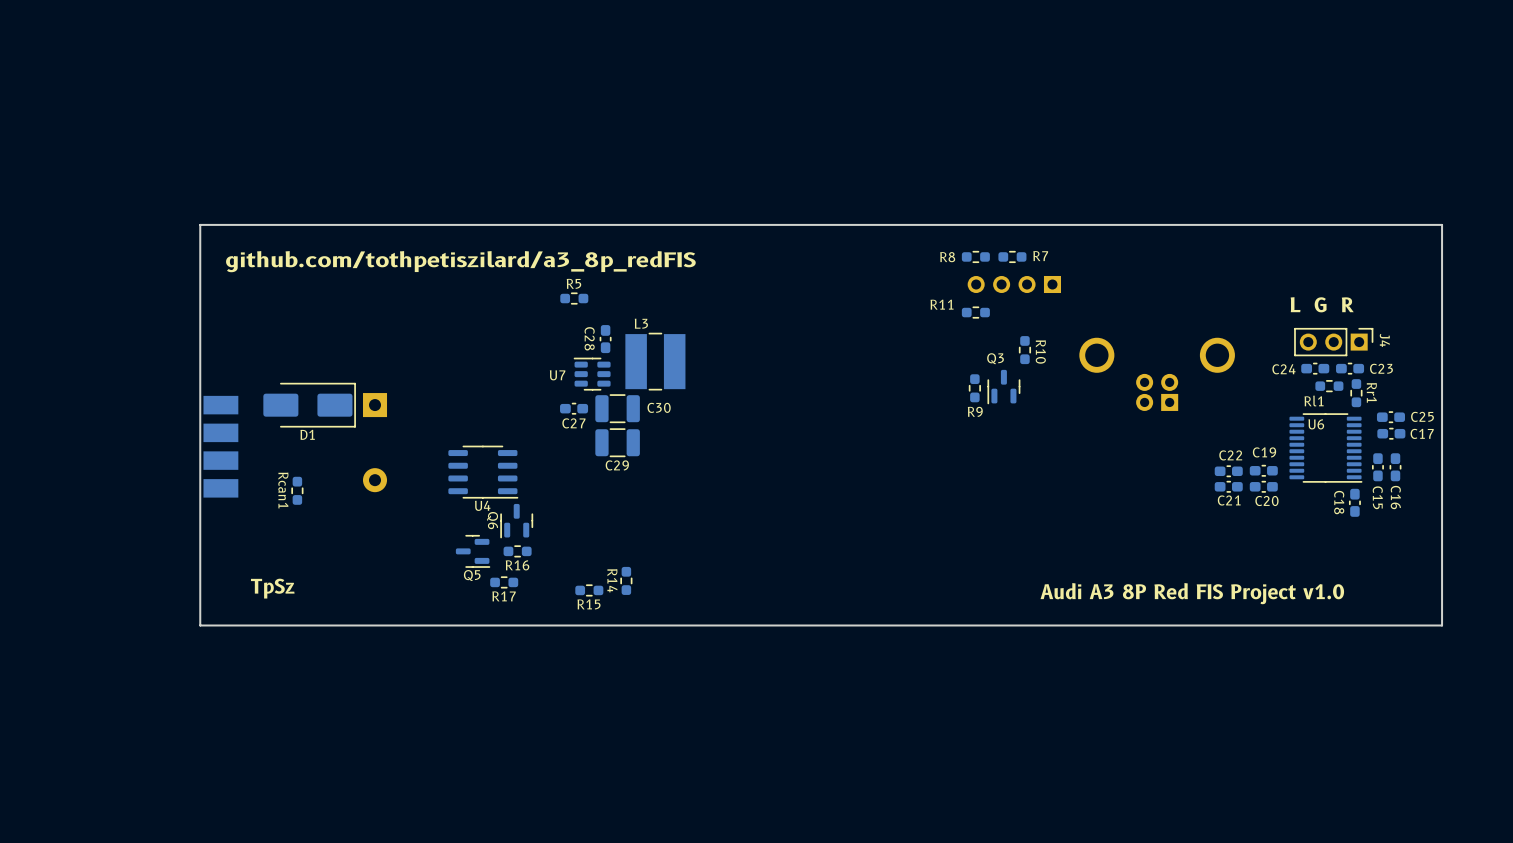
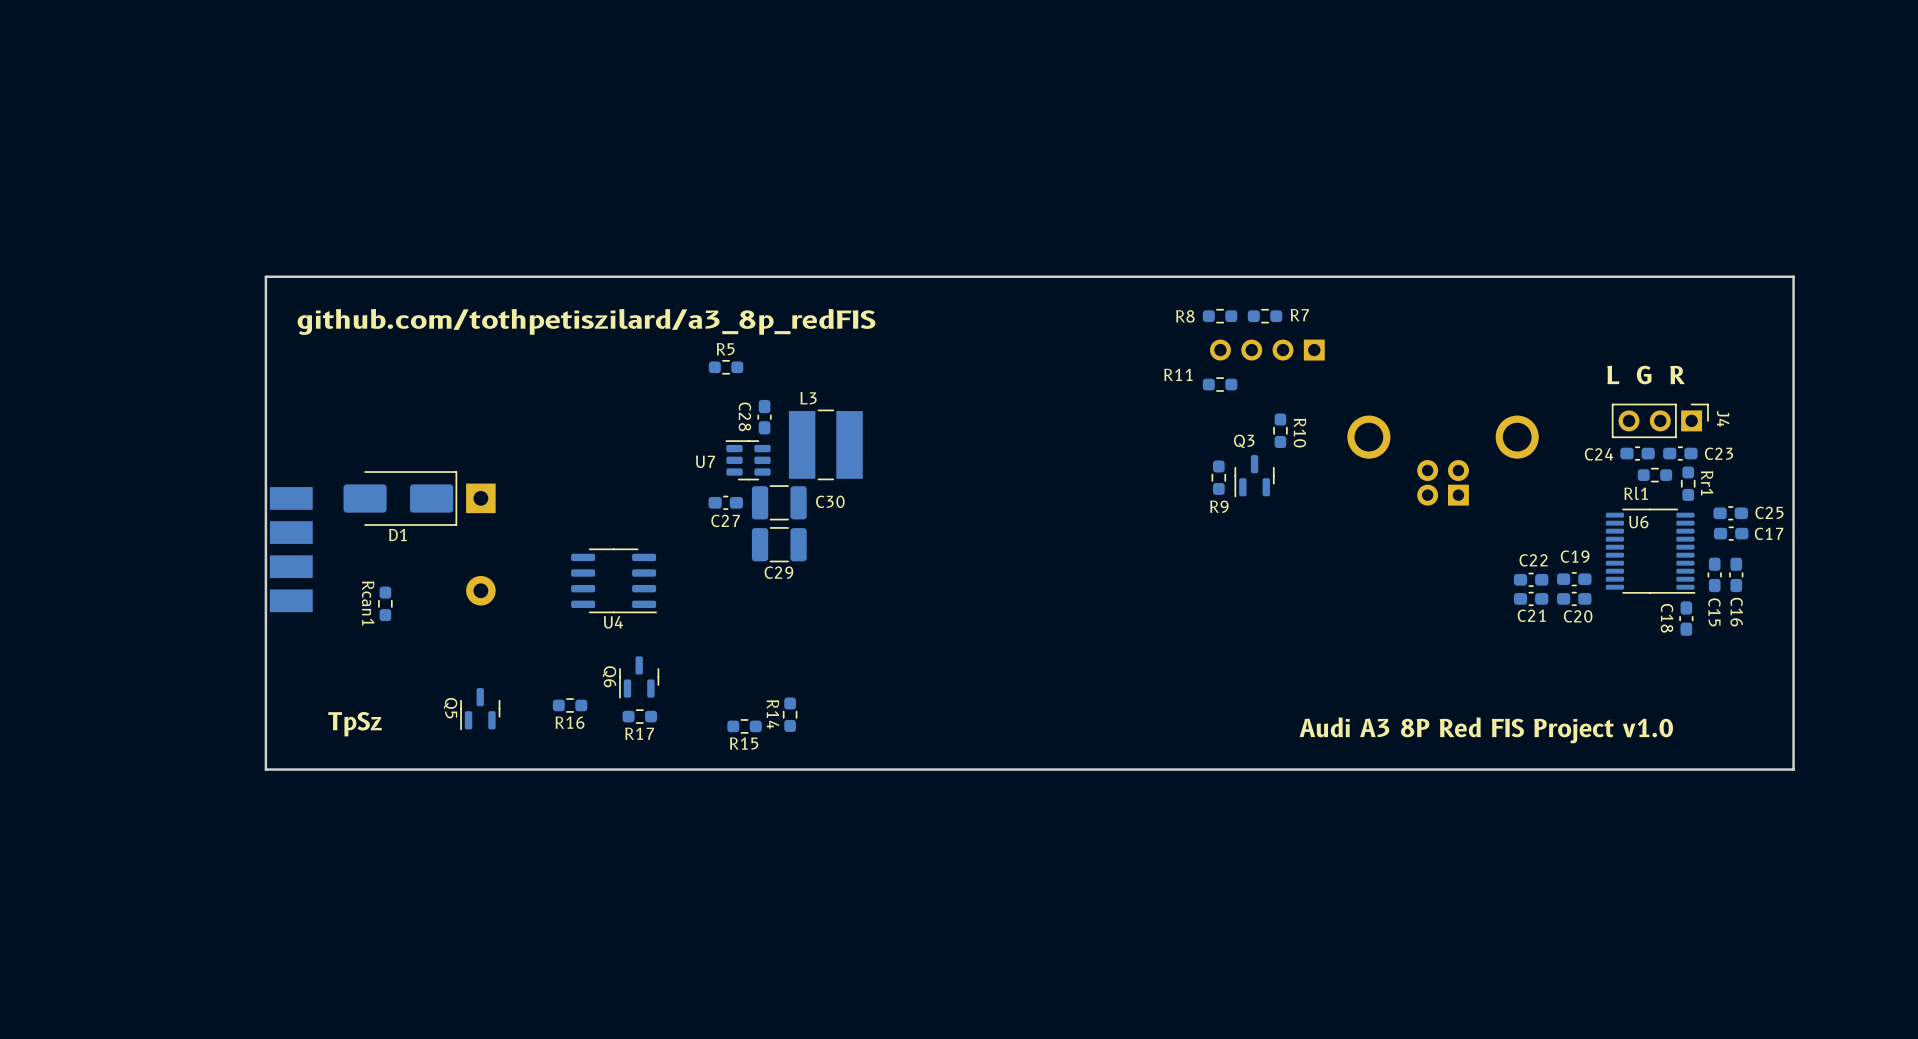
Q6 position: (516, 521) -> (639, 677)
Q5 rotation: 0° (472, 551) -> 90° clockwise (480, 709)
Q5 position: (472, 551) -> (480, 709)
R16 position: (517, 551) -> (570, 705)

